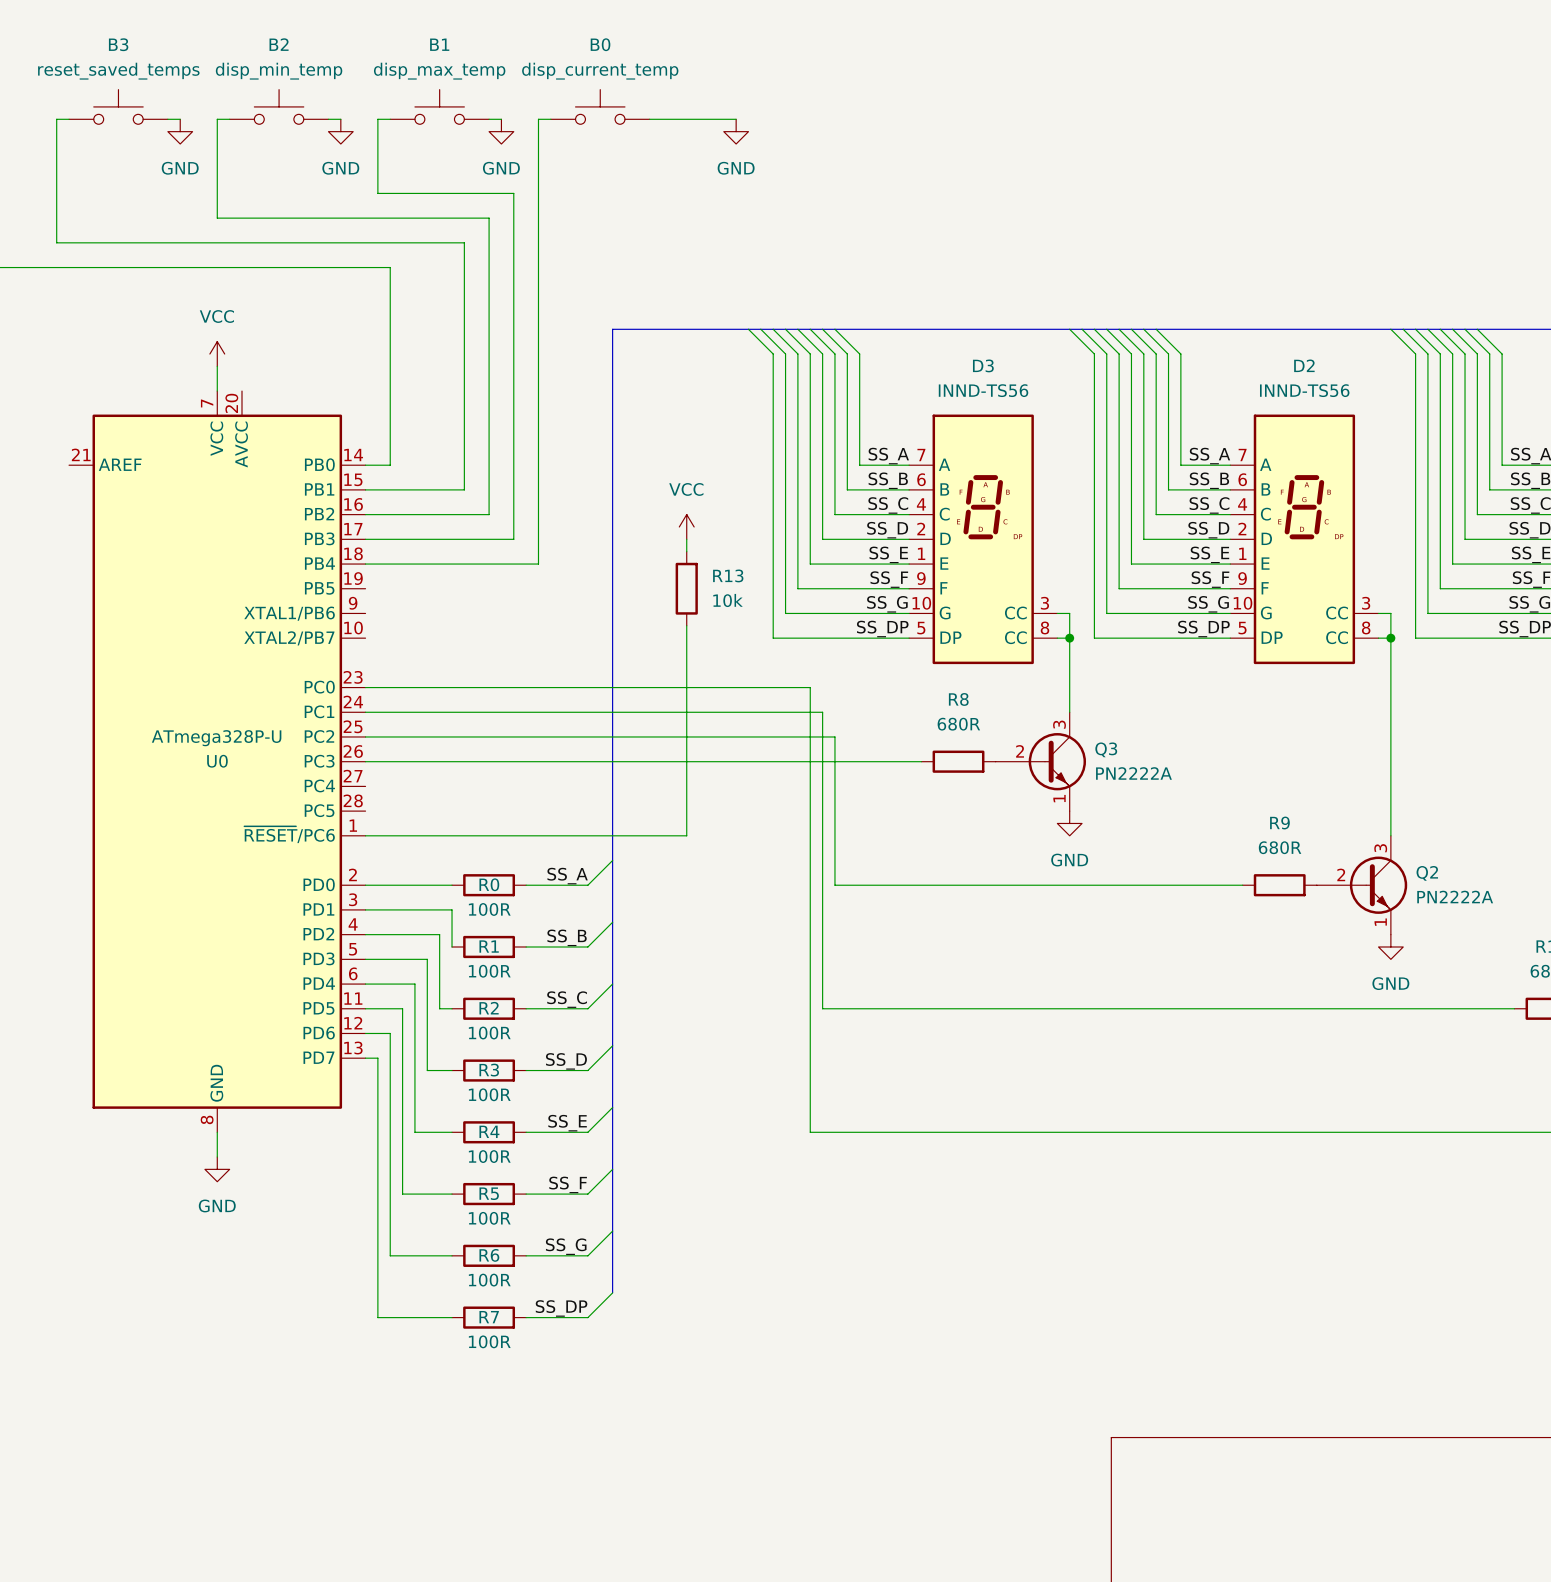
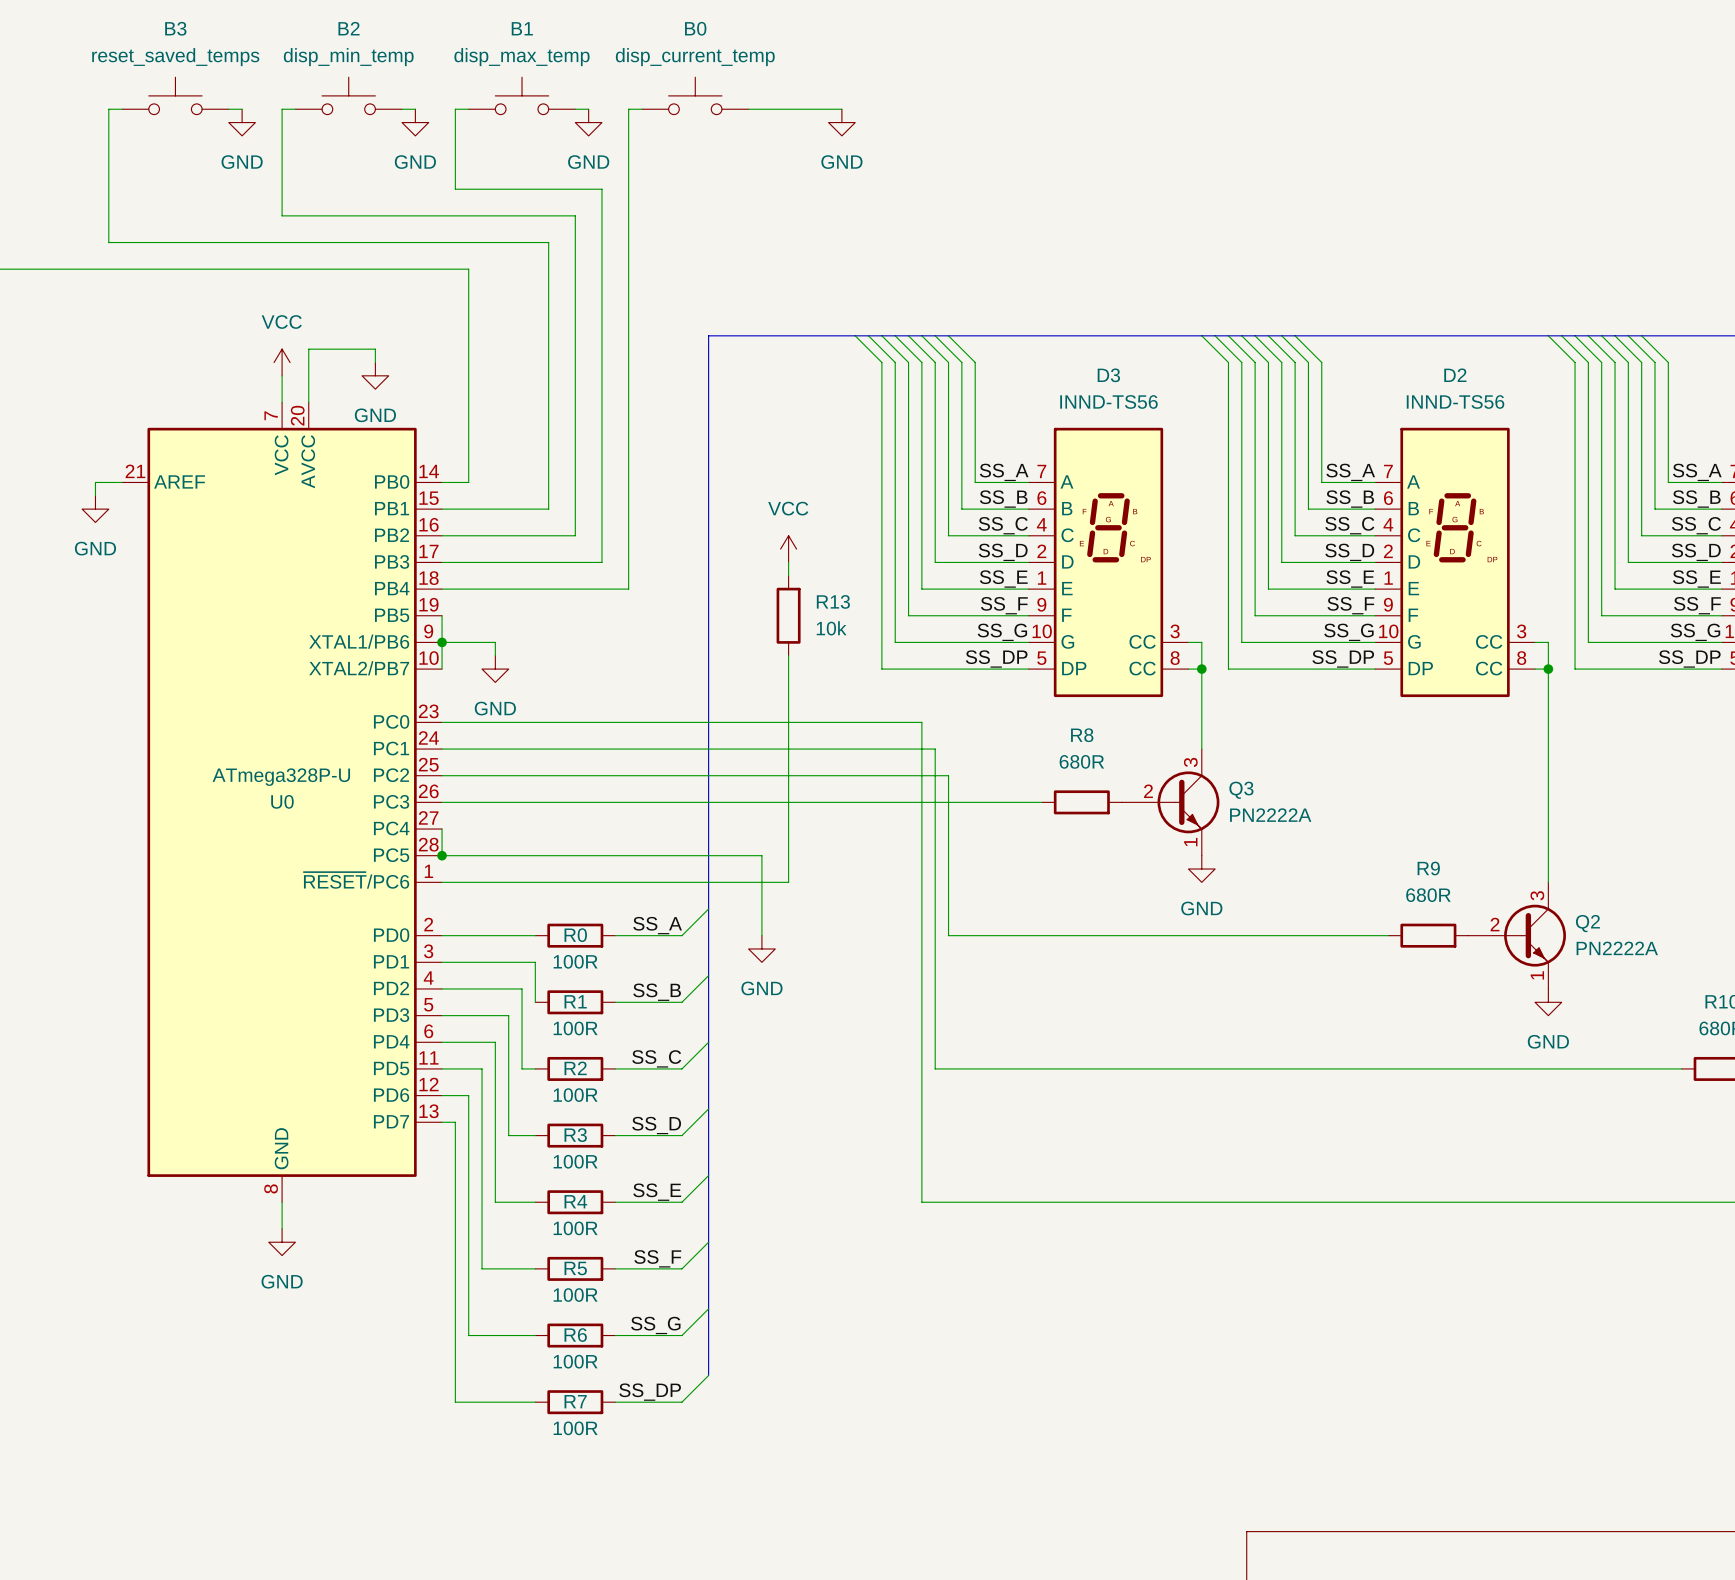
wire: none -> (375, 362) (375, 349) (308, 349) (308, 402)
power symbol: none -> GND (375, 375)
wire: none -> (122, 482) (95, 482) (95, 495)
power symbol: none -> GND (95, 509)
wire: none -> (442, 615) (442, 669)
wire: none -> (442, 642) (495, 642) (495, 655)
junction: none -> (442, 642)
power symbol: none -> GND (495, 669)
wire: none -> (442, 829) (442, 855) (761, 855) (761, 935)
junction: none -> (442, 855)
power symbol: none -> GND (761, 948)

